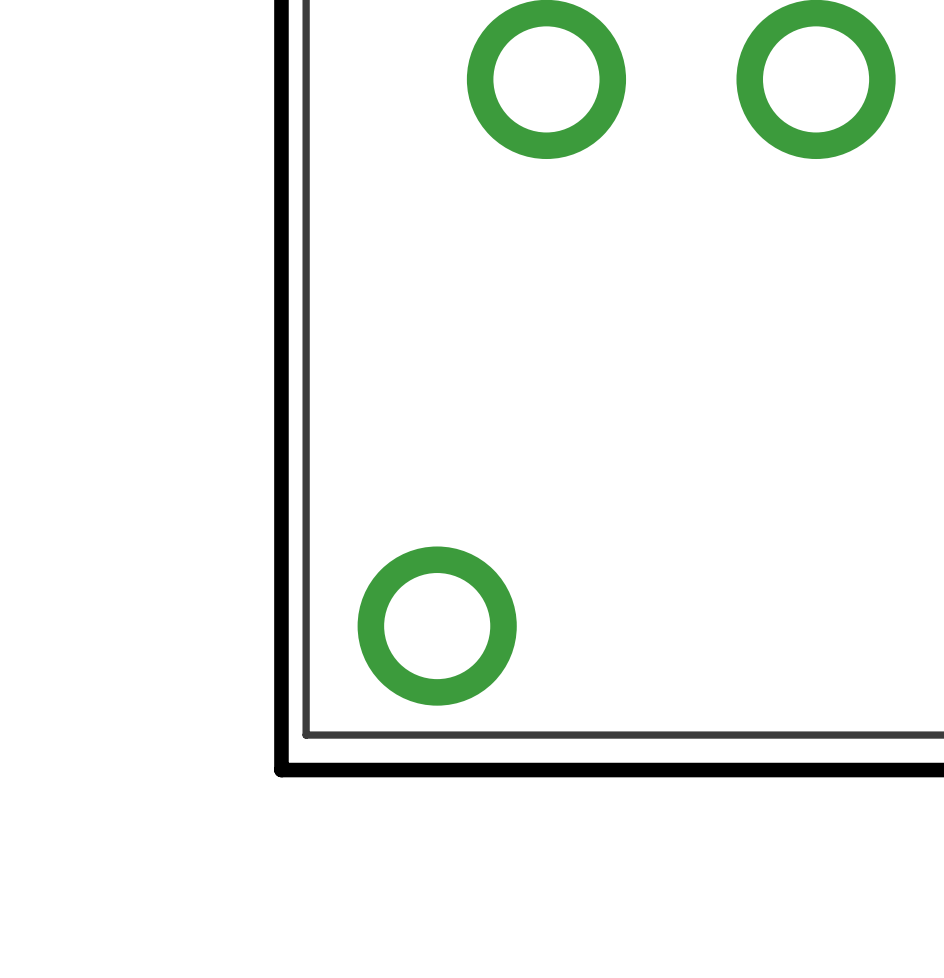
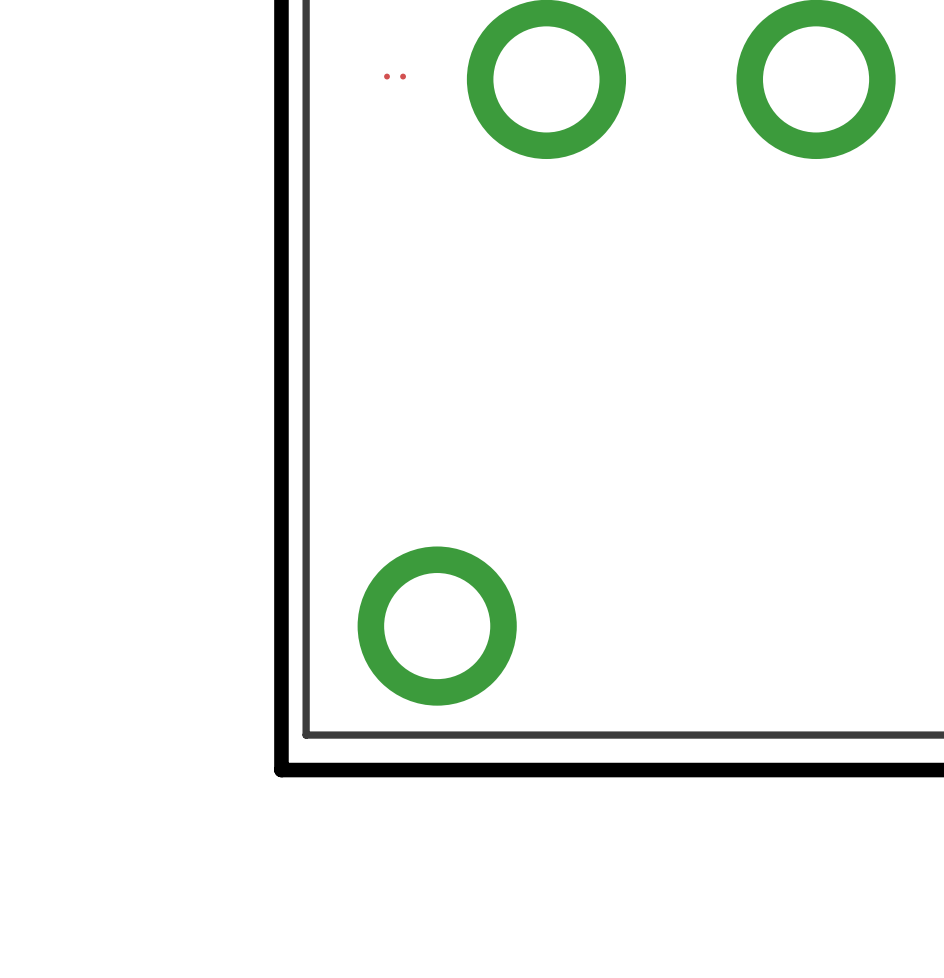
part: none -> (387, 76)
part: none -> (403, 76)

